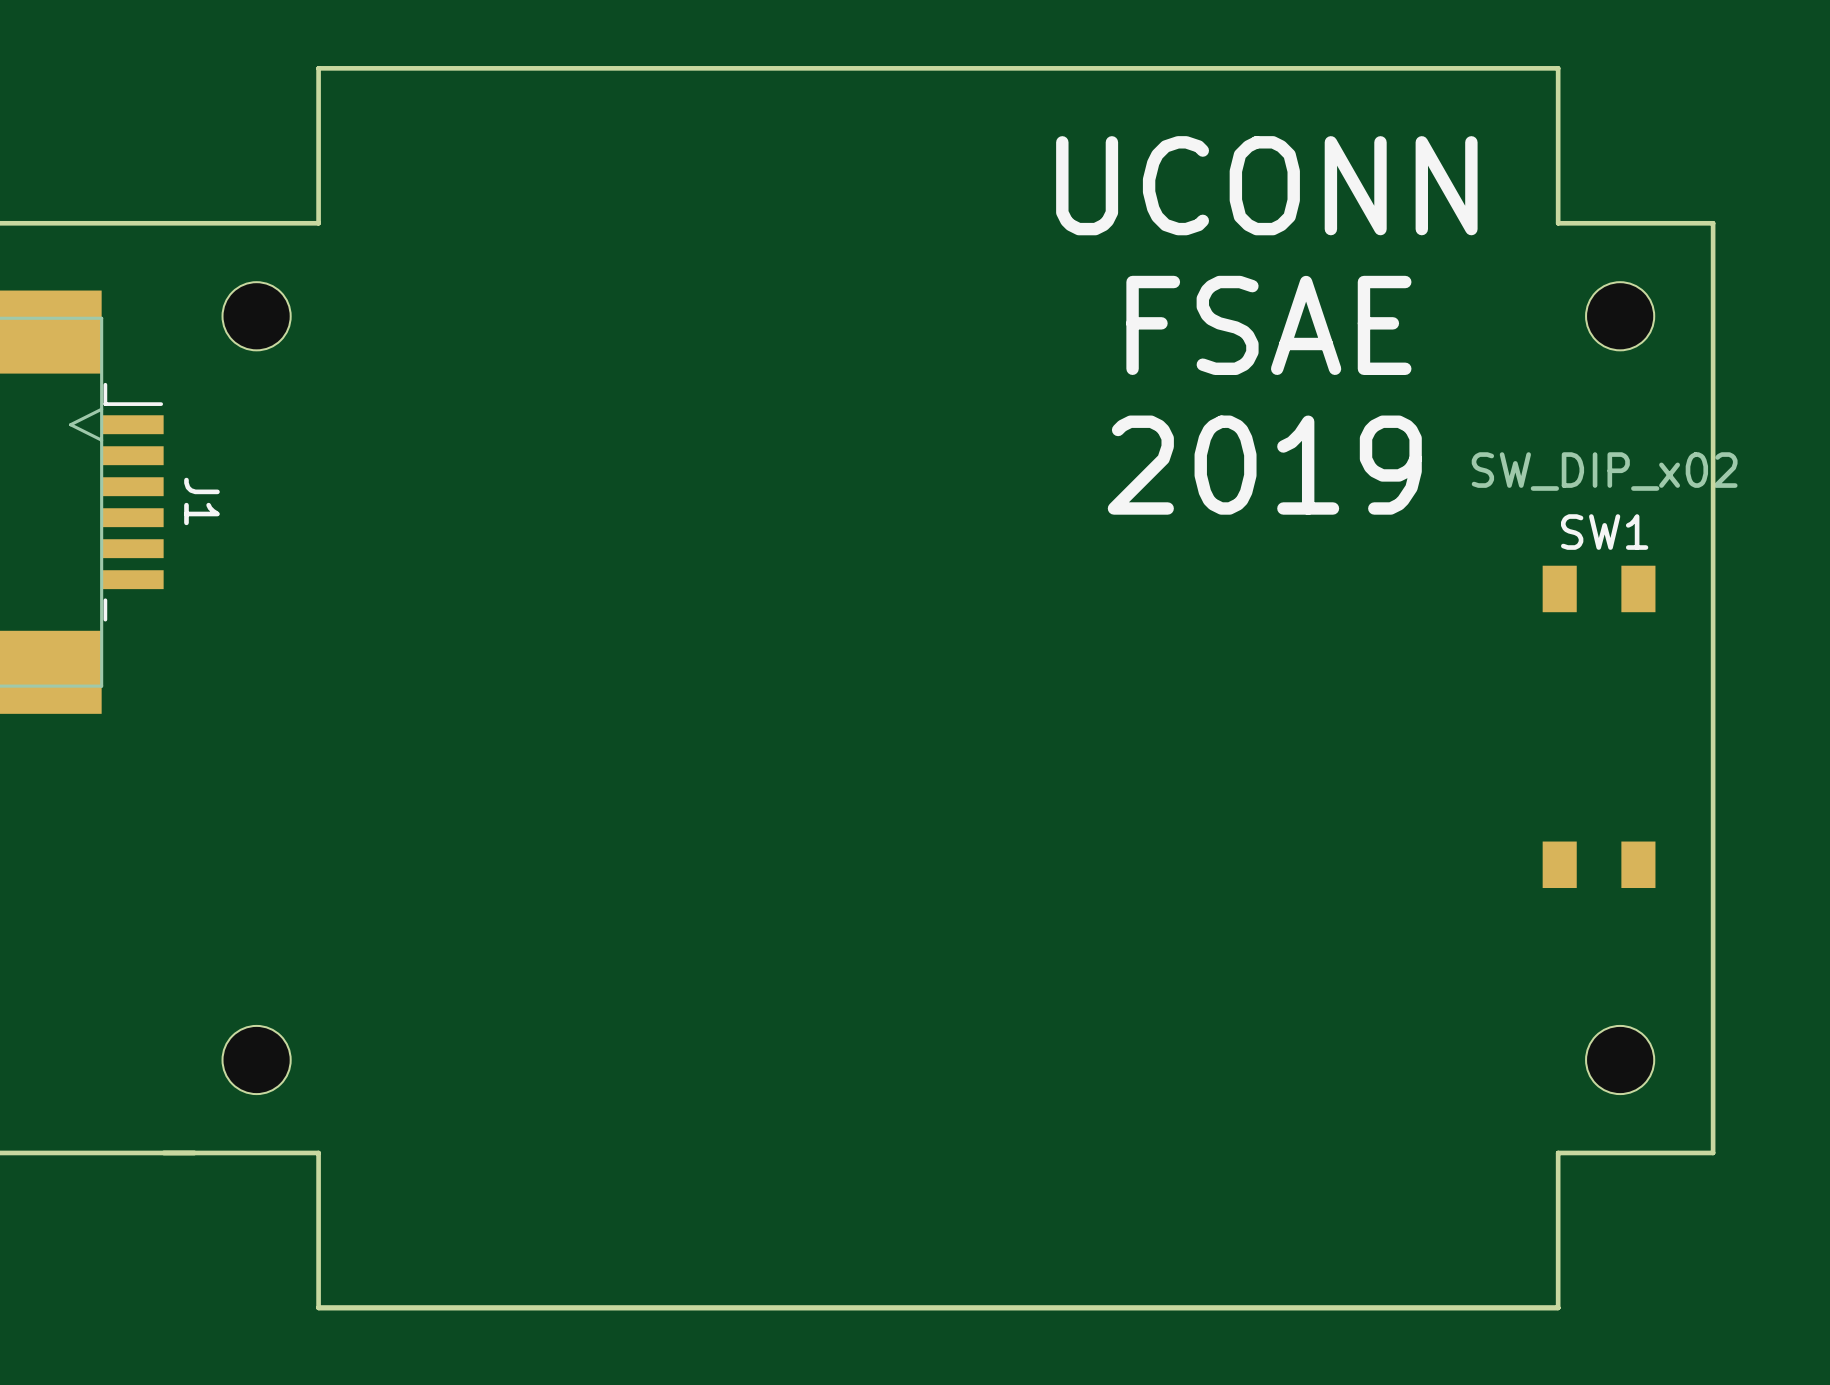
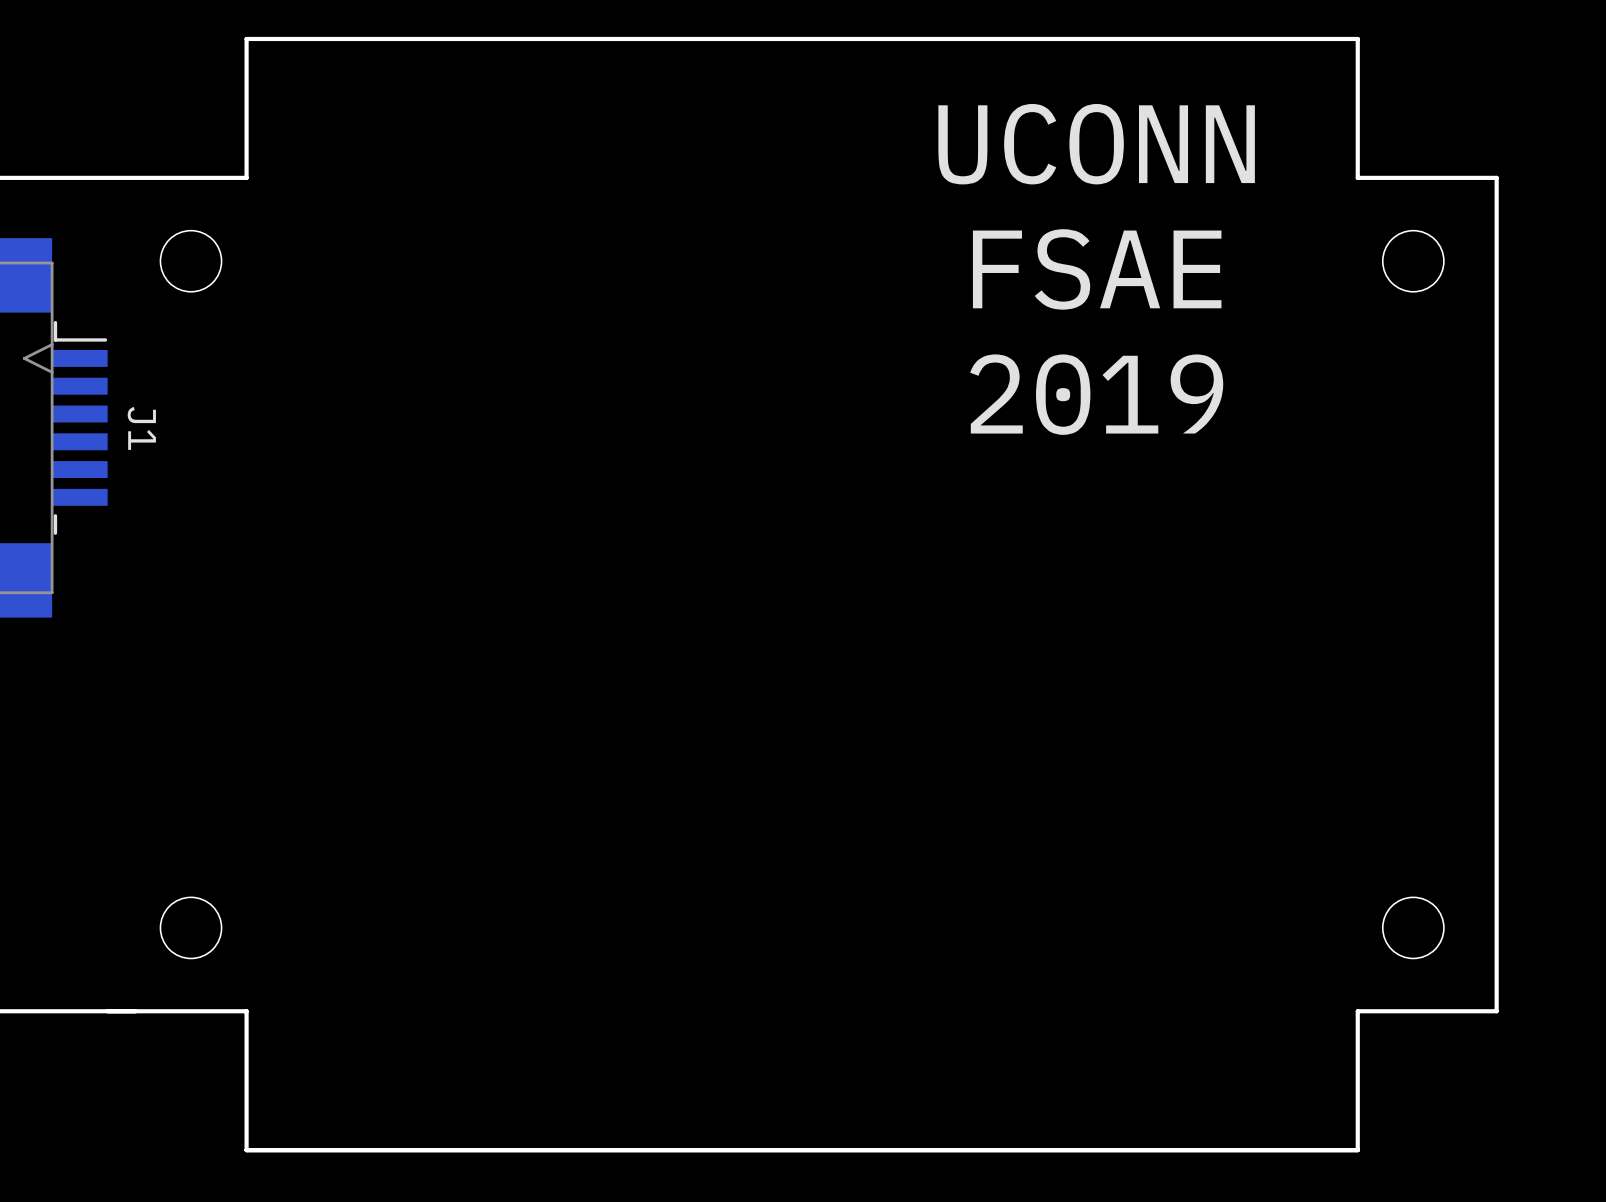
SW1: SW_DIP_x02 (1599, 726) -> none

